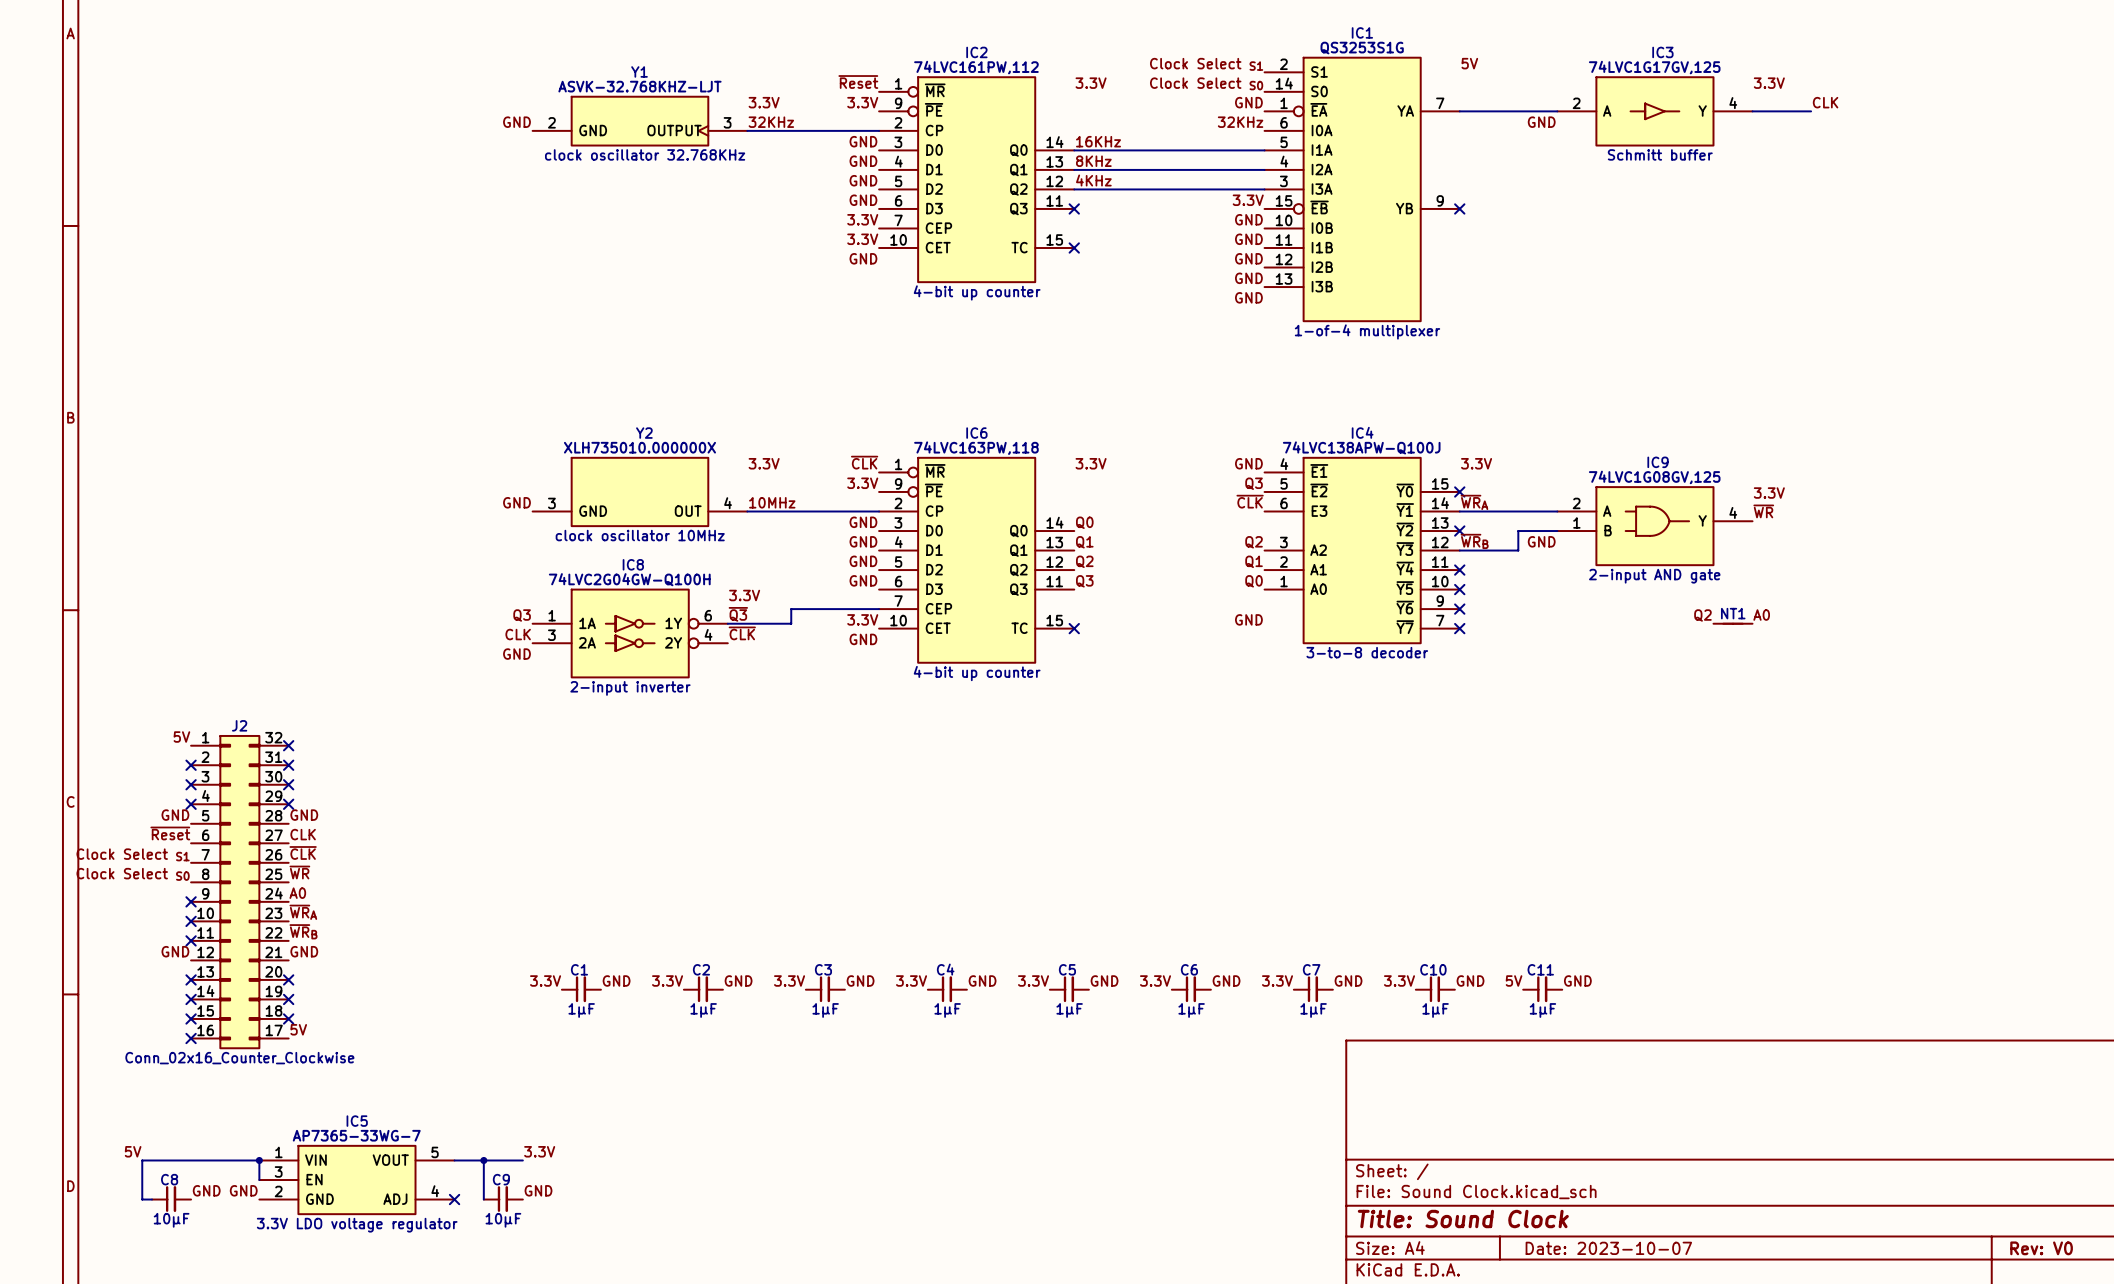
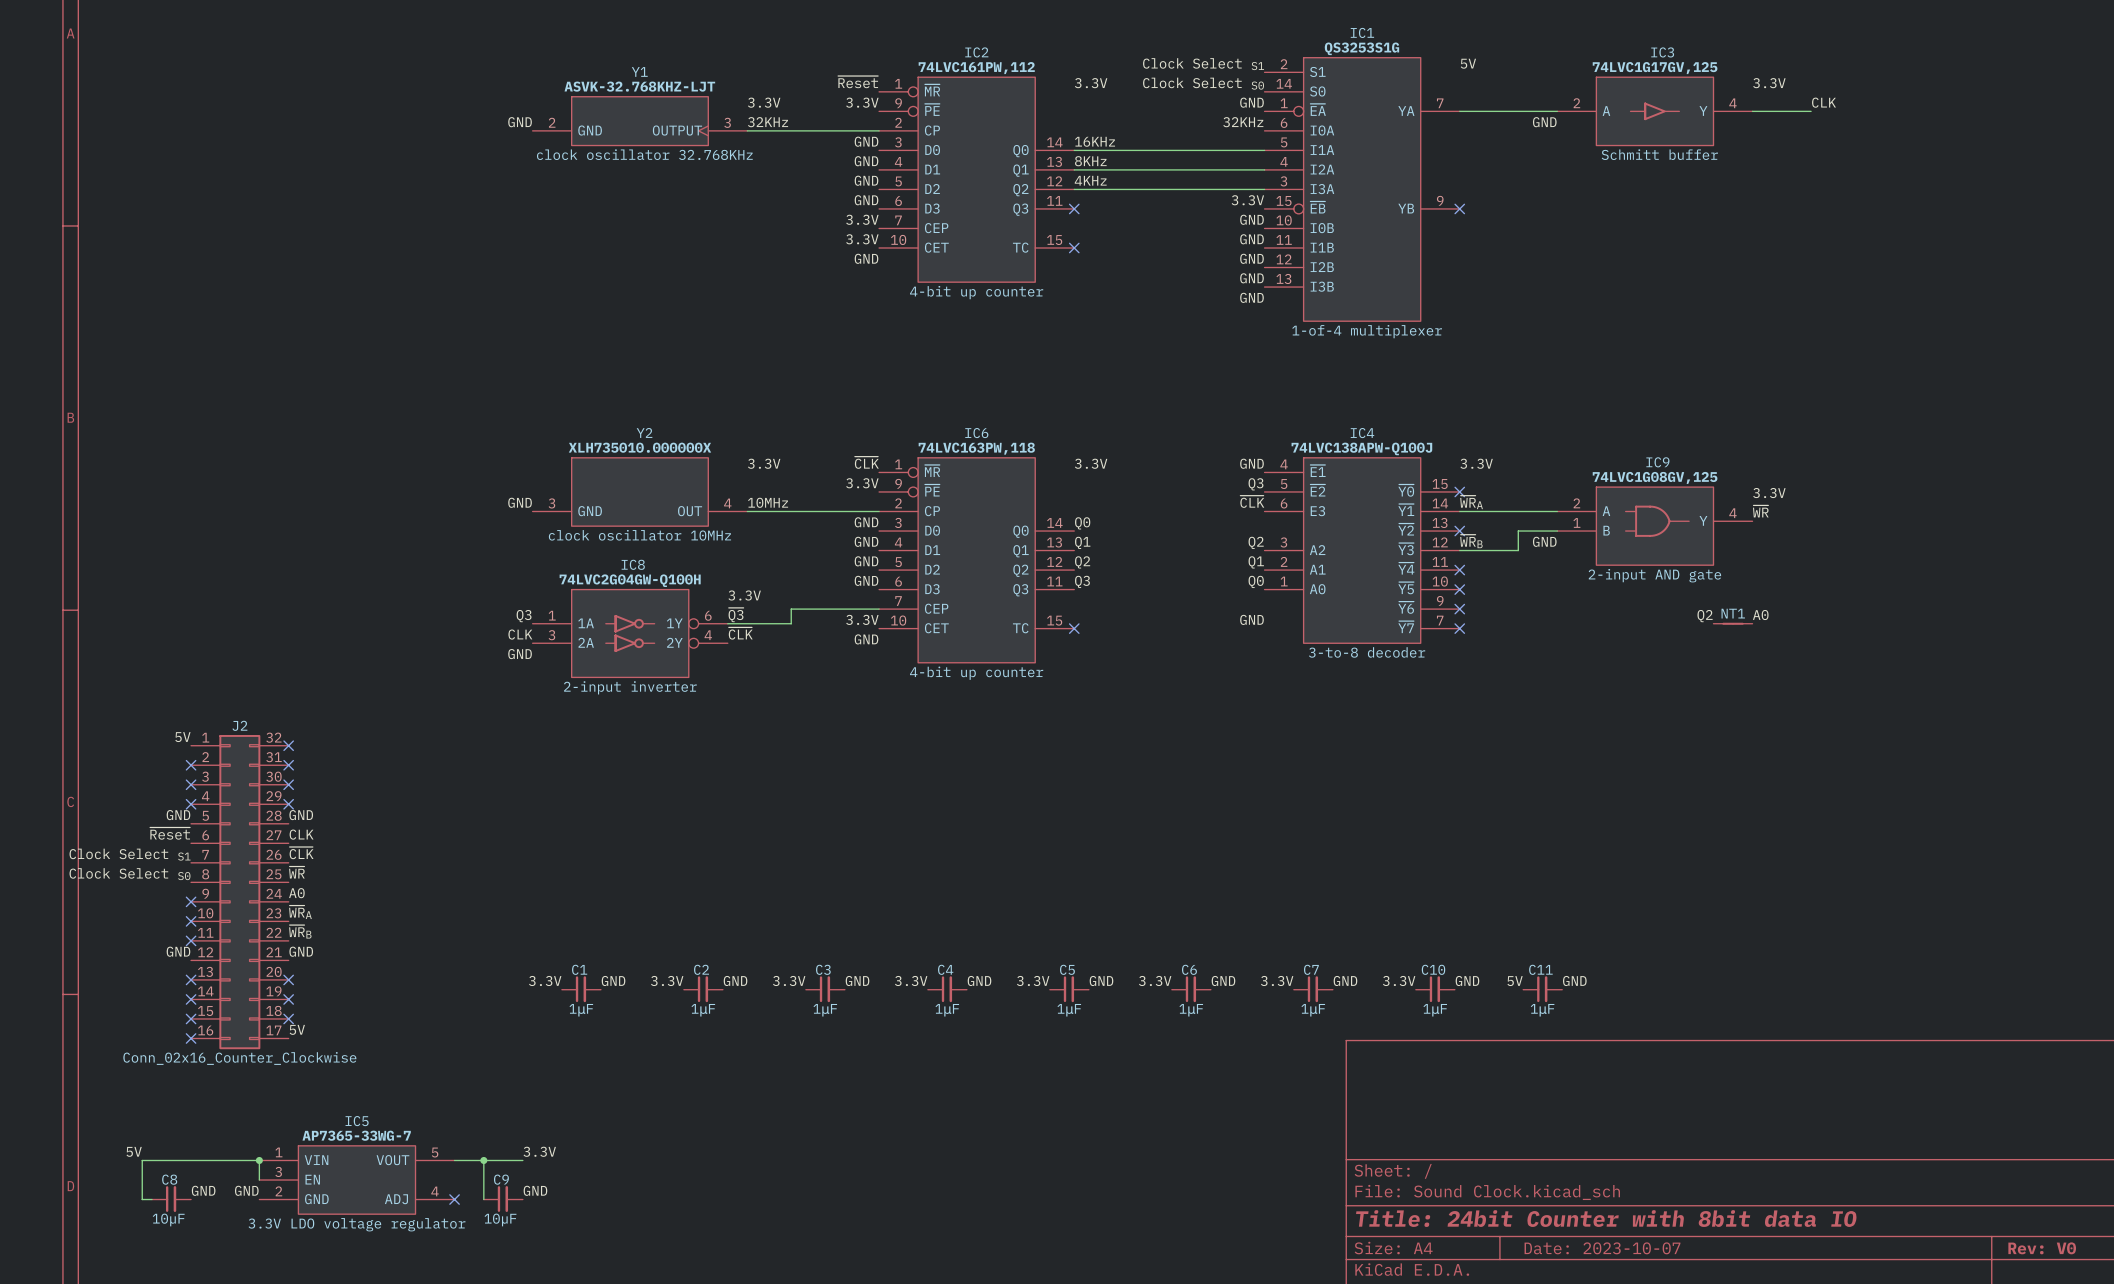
title block: Title: Sound Clock (1463, 1219) -> Title: 24bit Counter with 8bit data IO (1606, 1218)

